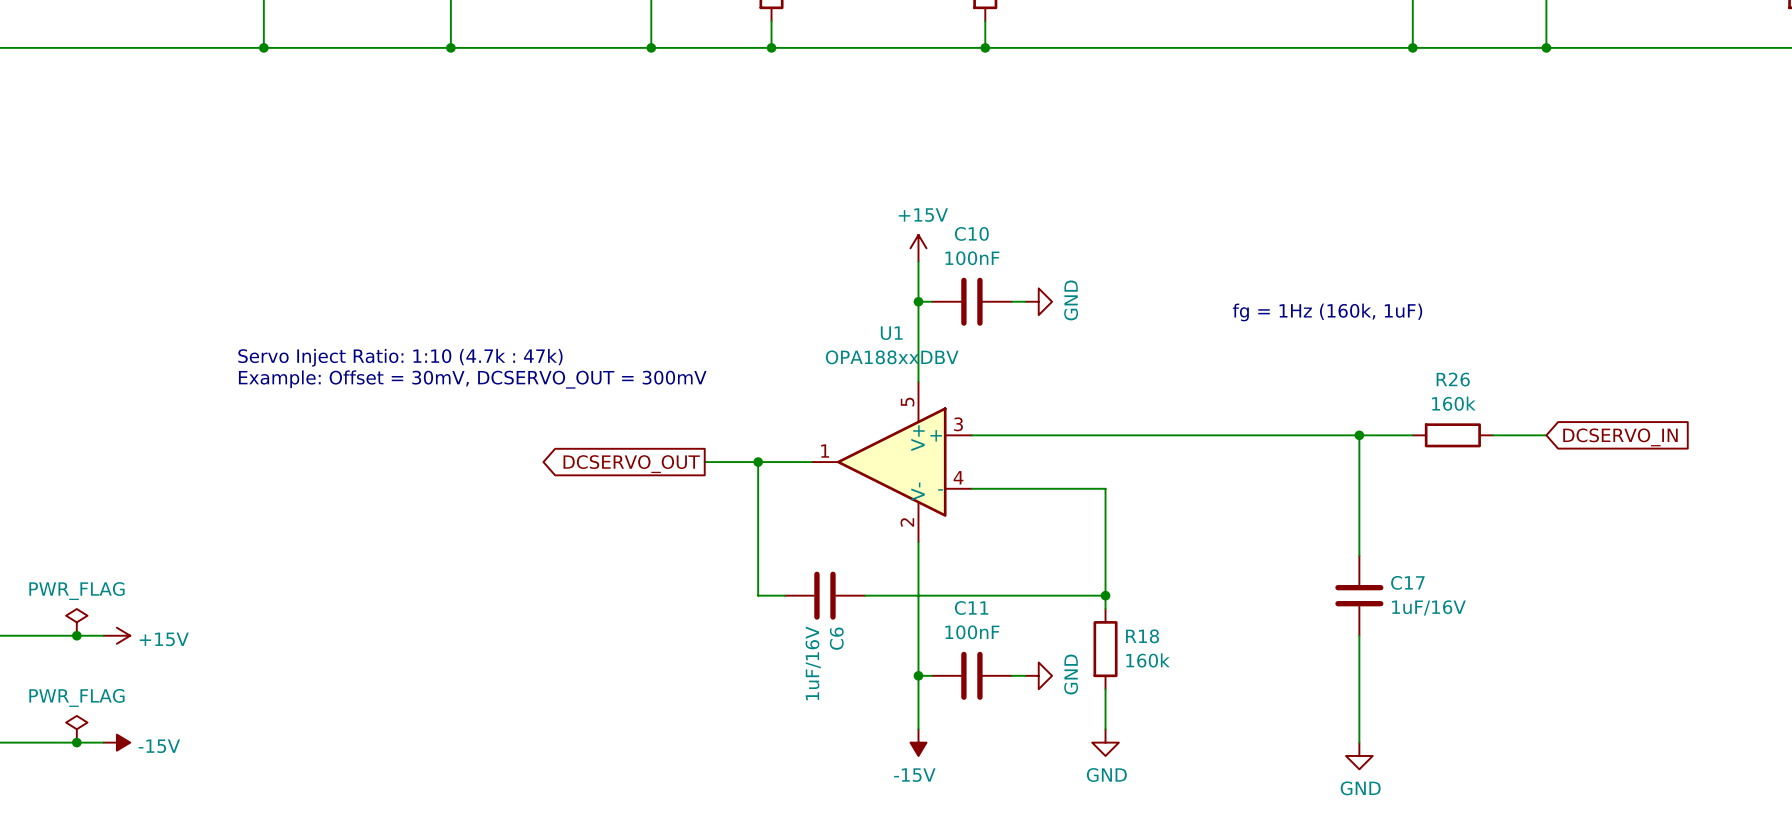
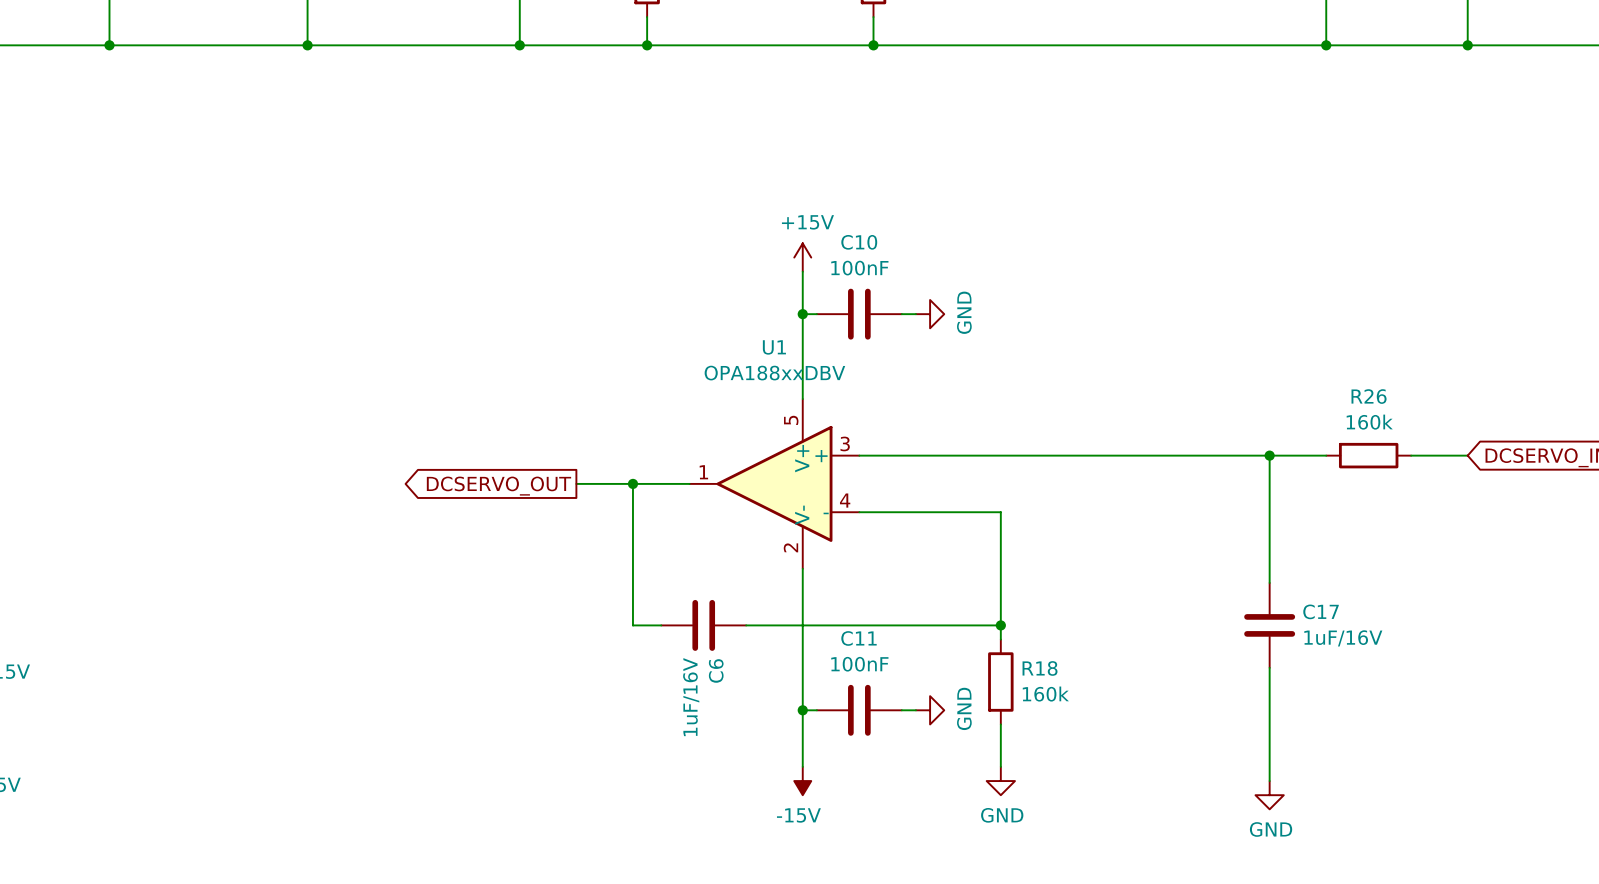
text: fg = 1Hz (160k, 1uF) (1327, 312) -> none
text: Servo Inject Ratio: 1:10 (4.7k : 47k) (400, 357) -> none
text: Example: Offset = 30mV, DCSERVO_OUT = 300mV (472, 379) -> none

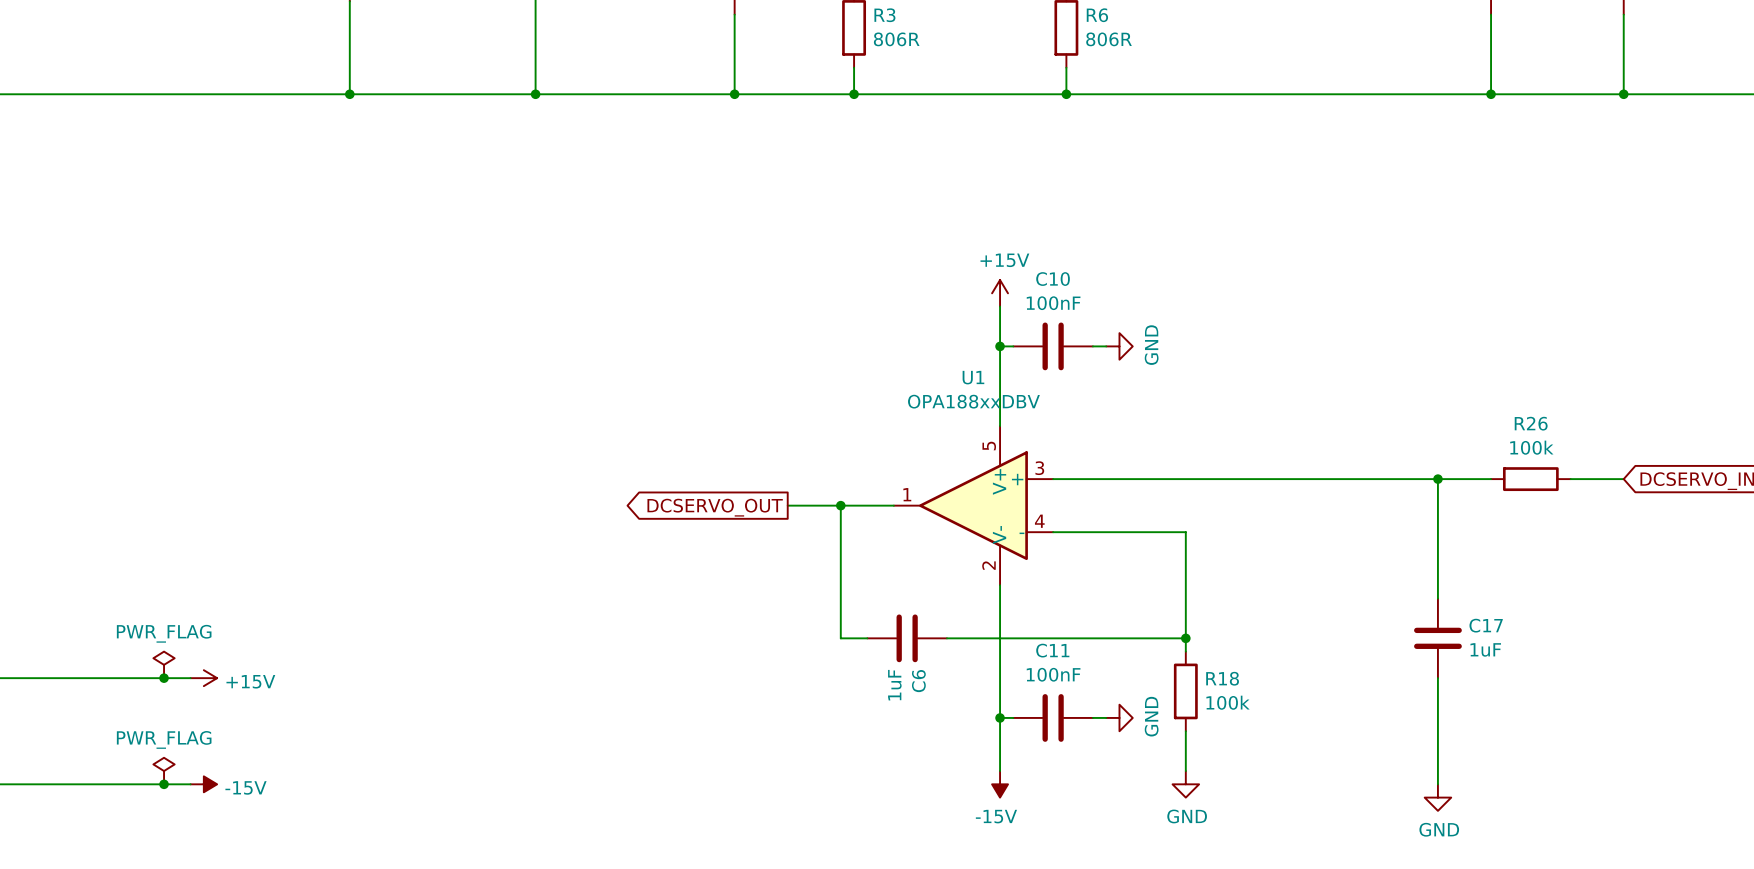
R26 value: 160k (1369, 422) -> 100k (1531, 447)
C17 value: 1uF/16V (1343, 638) -> 1uF (1485, 649)
R18 value: 160k (1045, 694) -> 100k (1228, 702)
C6 value: 1uF/16V (691, 697) -> 1uF (894, 685)

